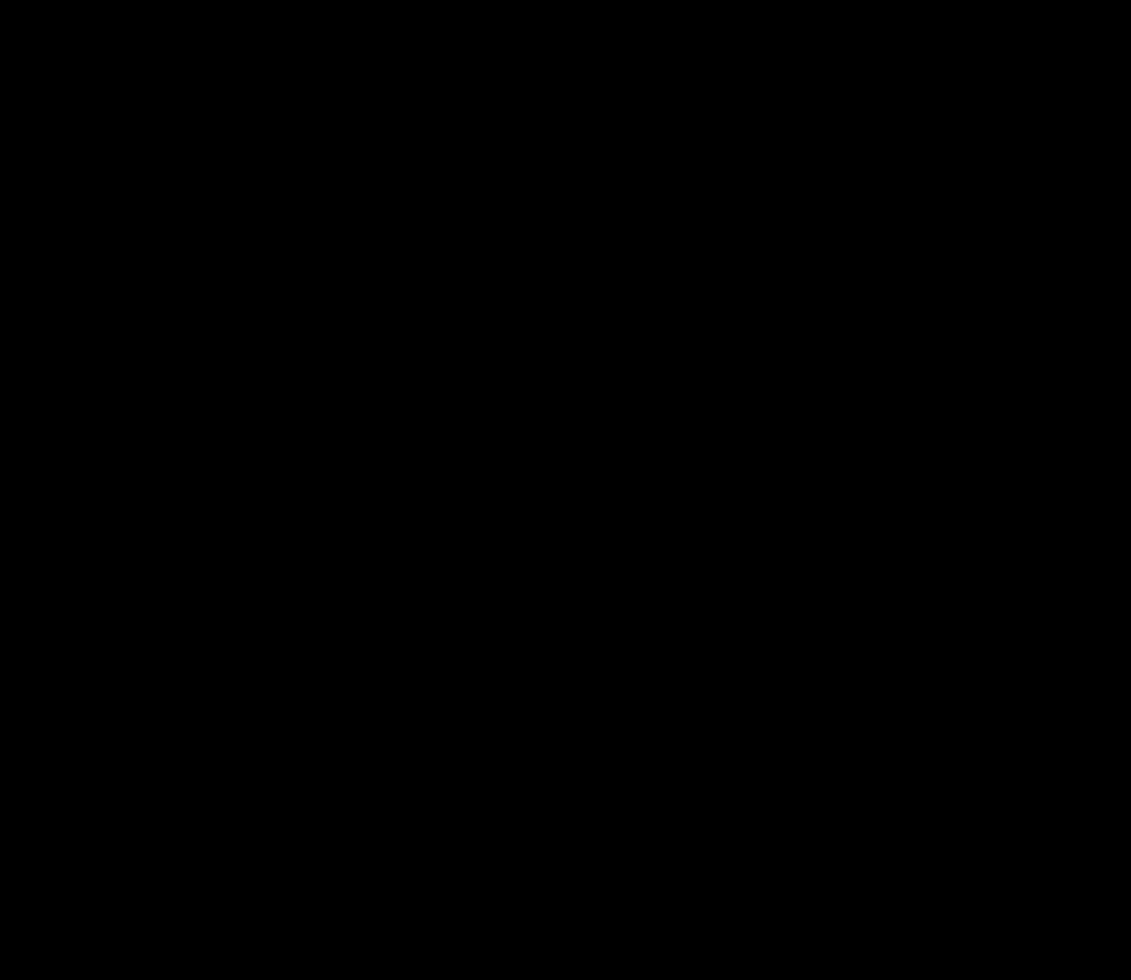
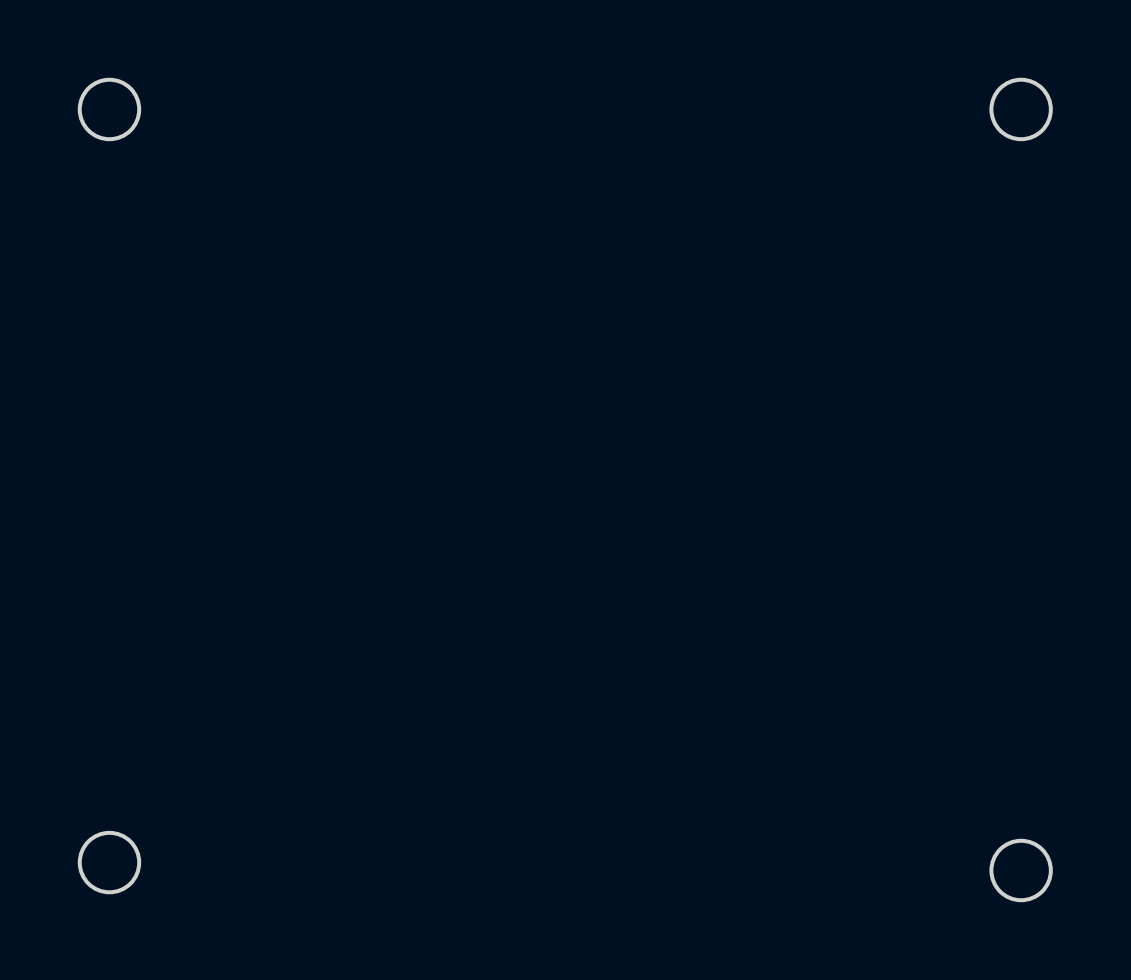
round board edge: none -> [77, 77, 142, 142]
round board edge: none -> [989, 77, 1053, 142]
round board edge: none -> [77, 830, 142, 895]
round board edge: none -> [989, 838, 1053, 903]

